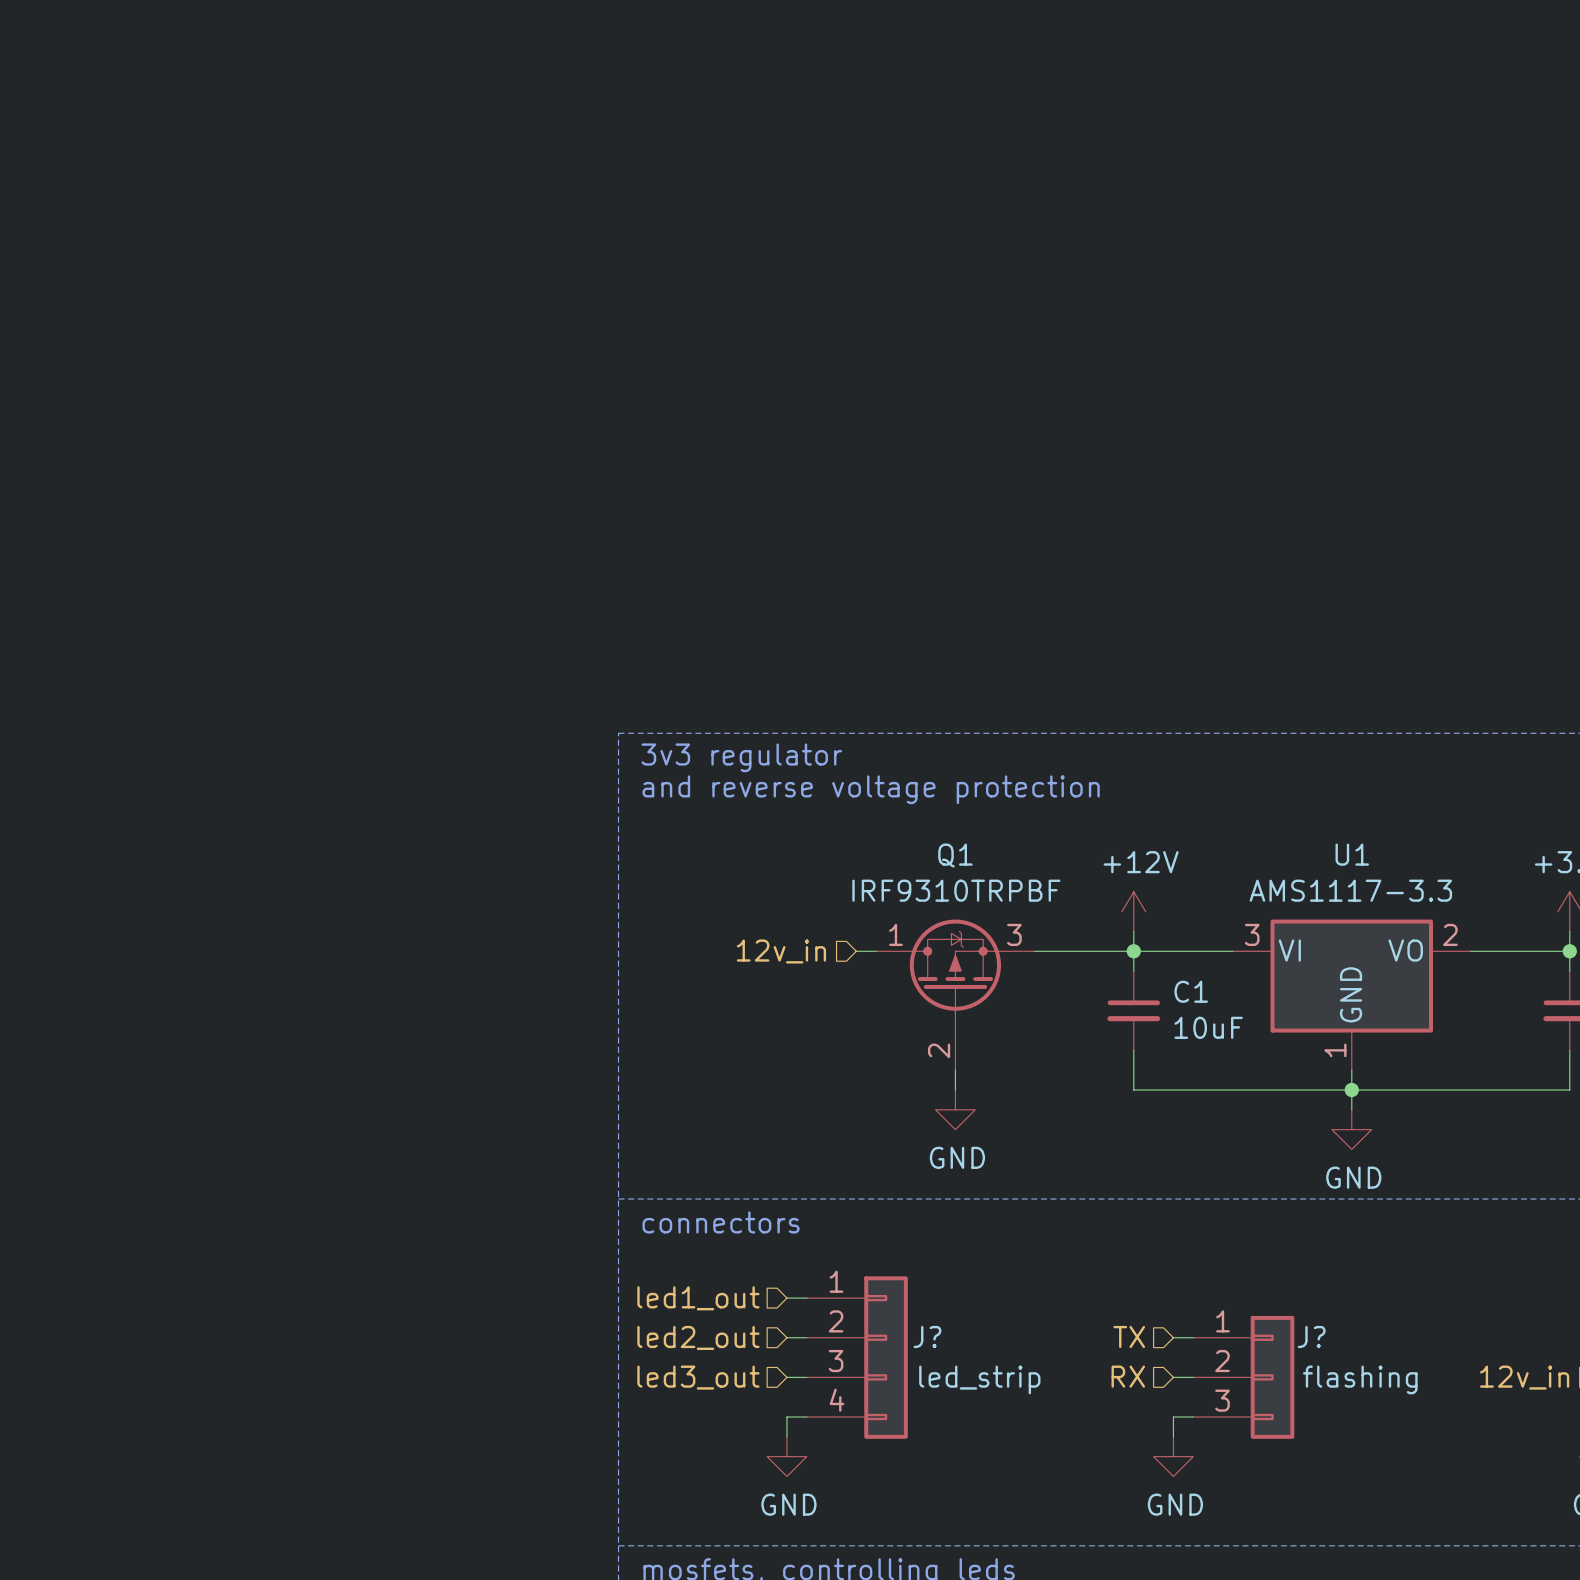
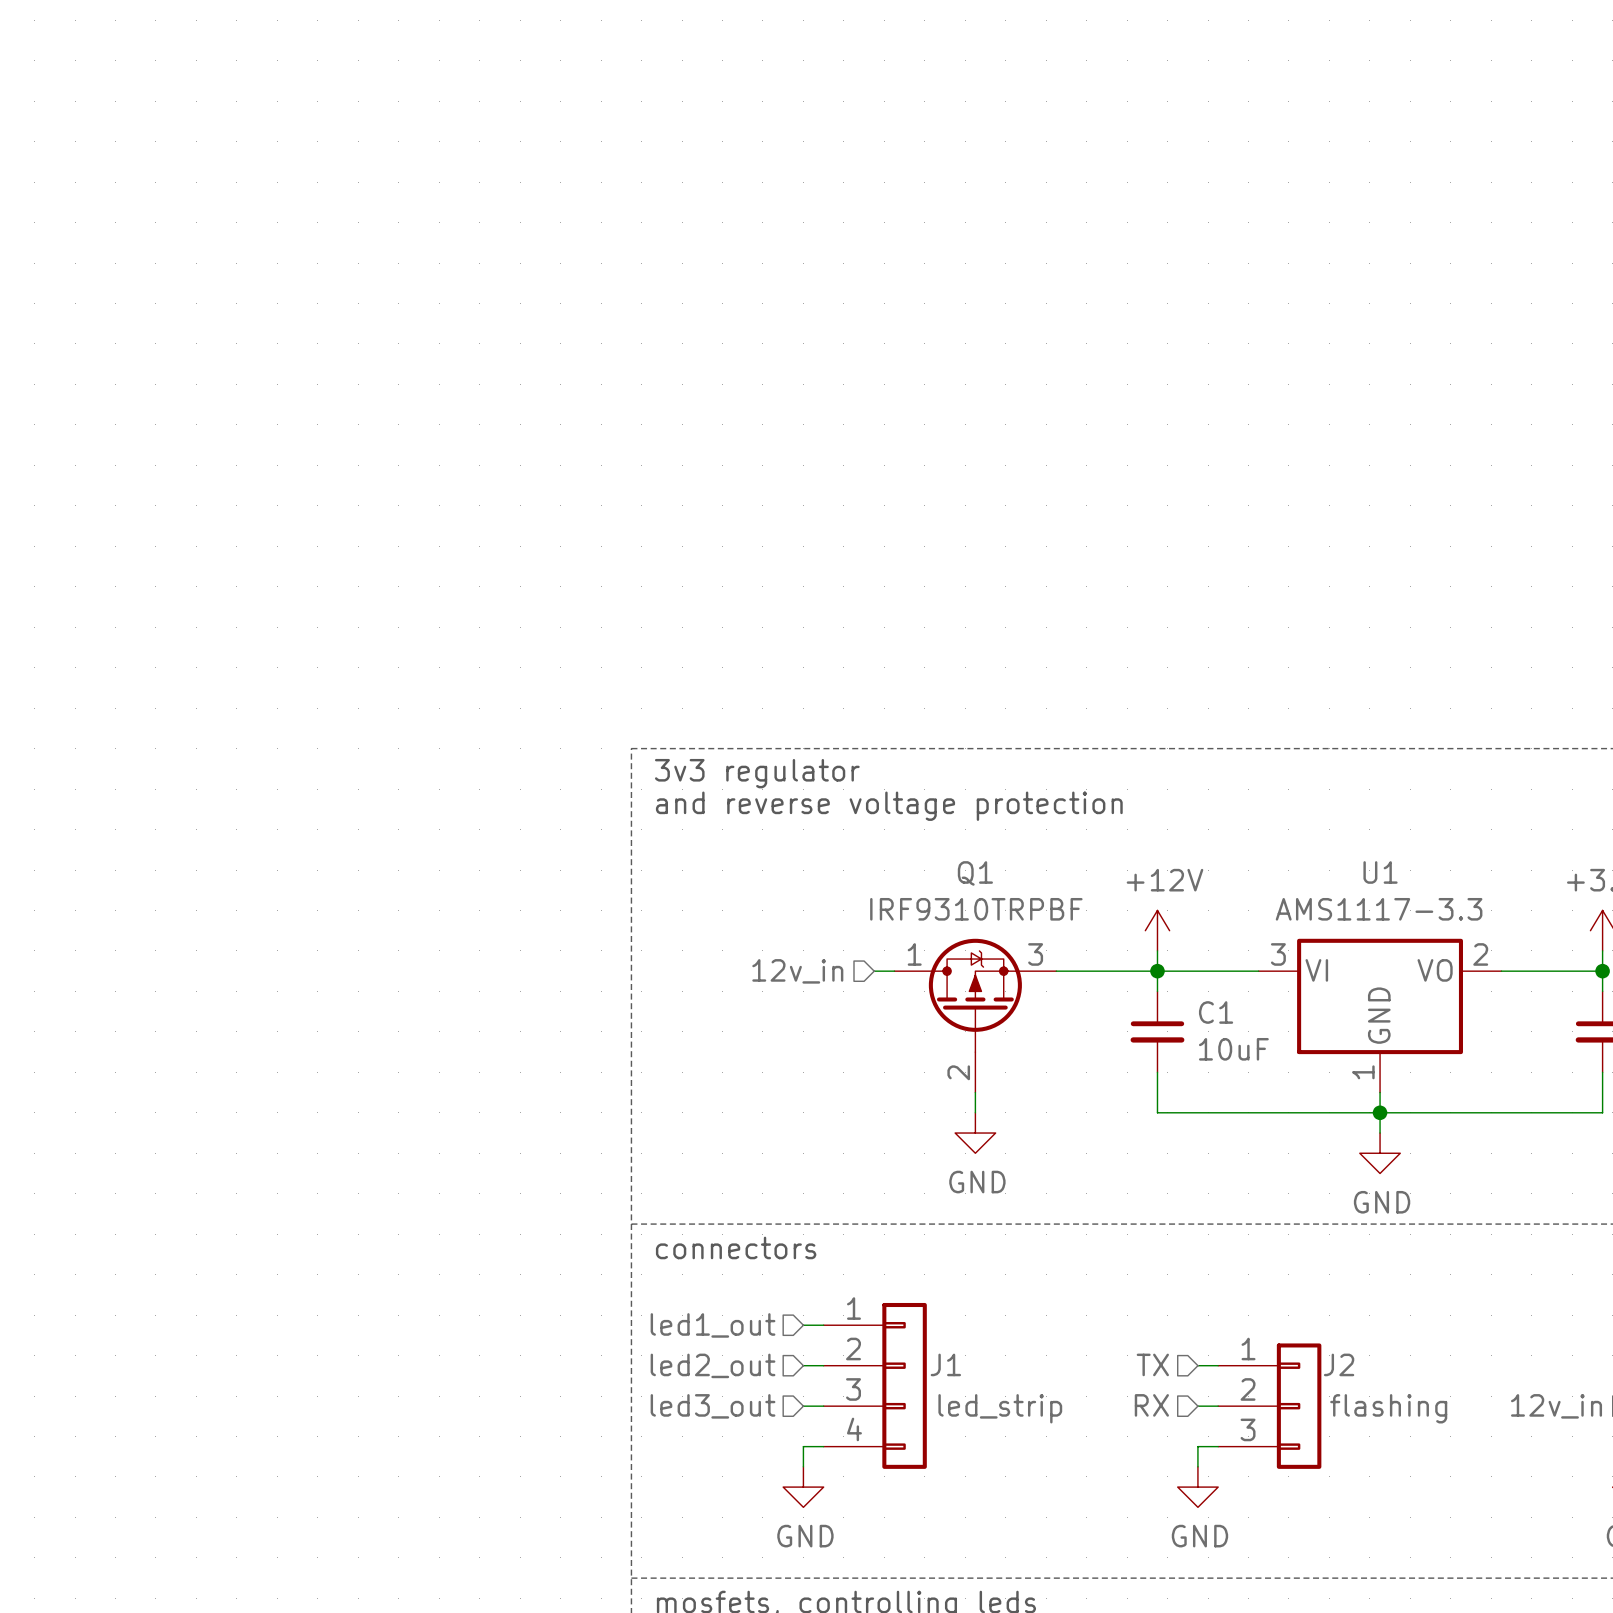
J? name: J? (927, 1337) -> J1 (945, 1364)
J? name: J? (1311, 1337) -> J2 (1339, 1364)

